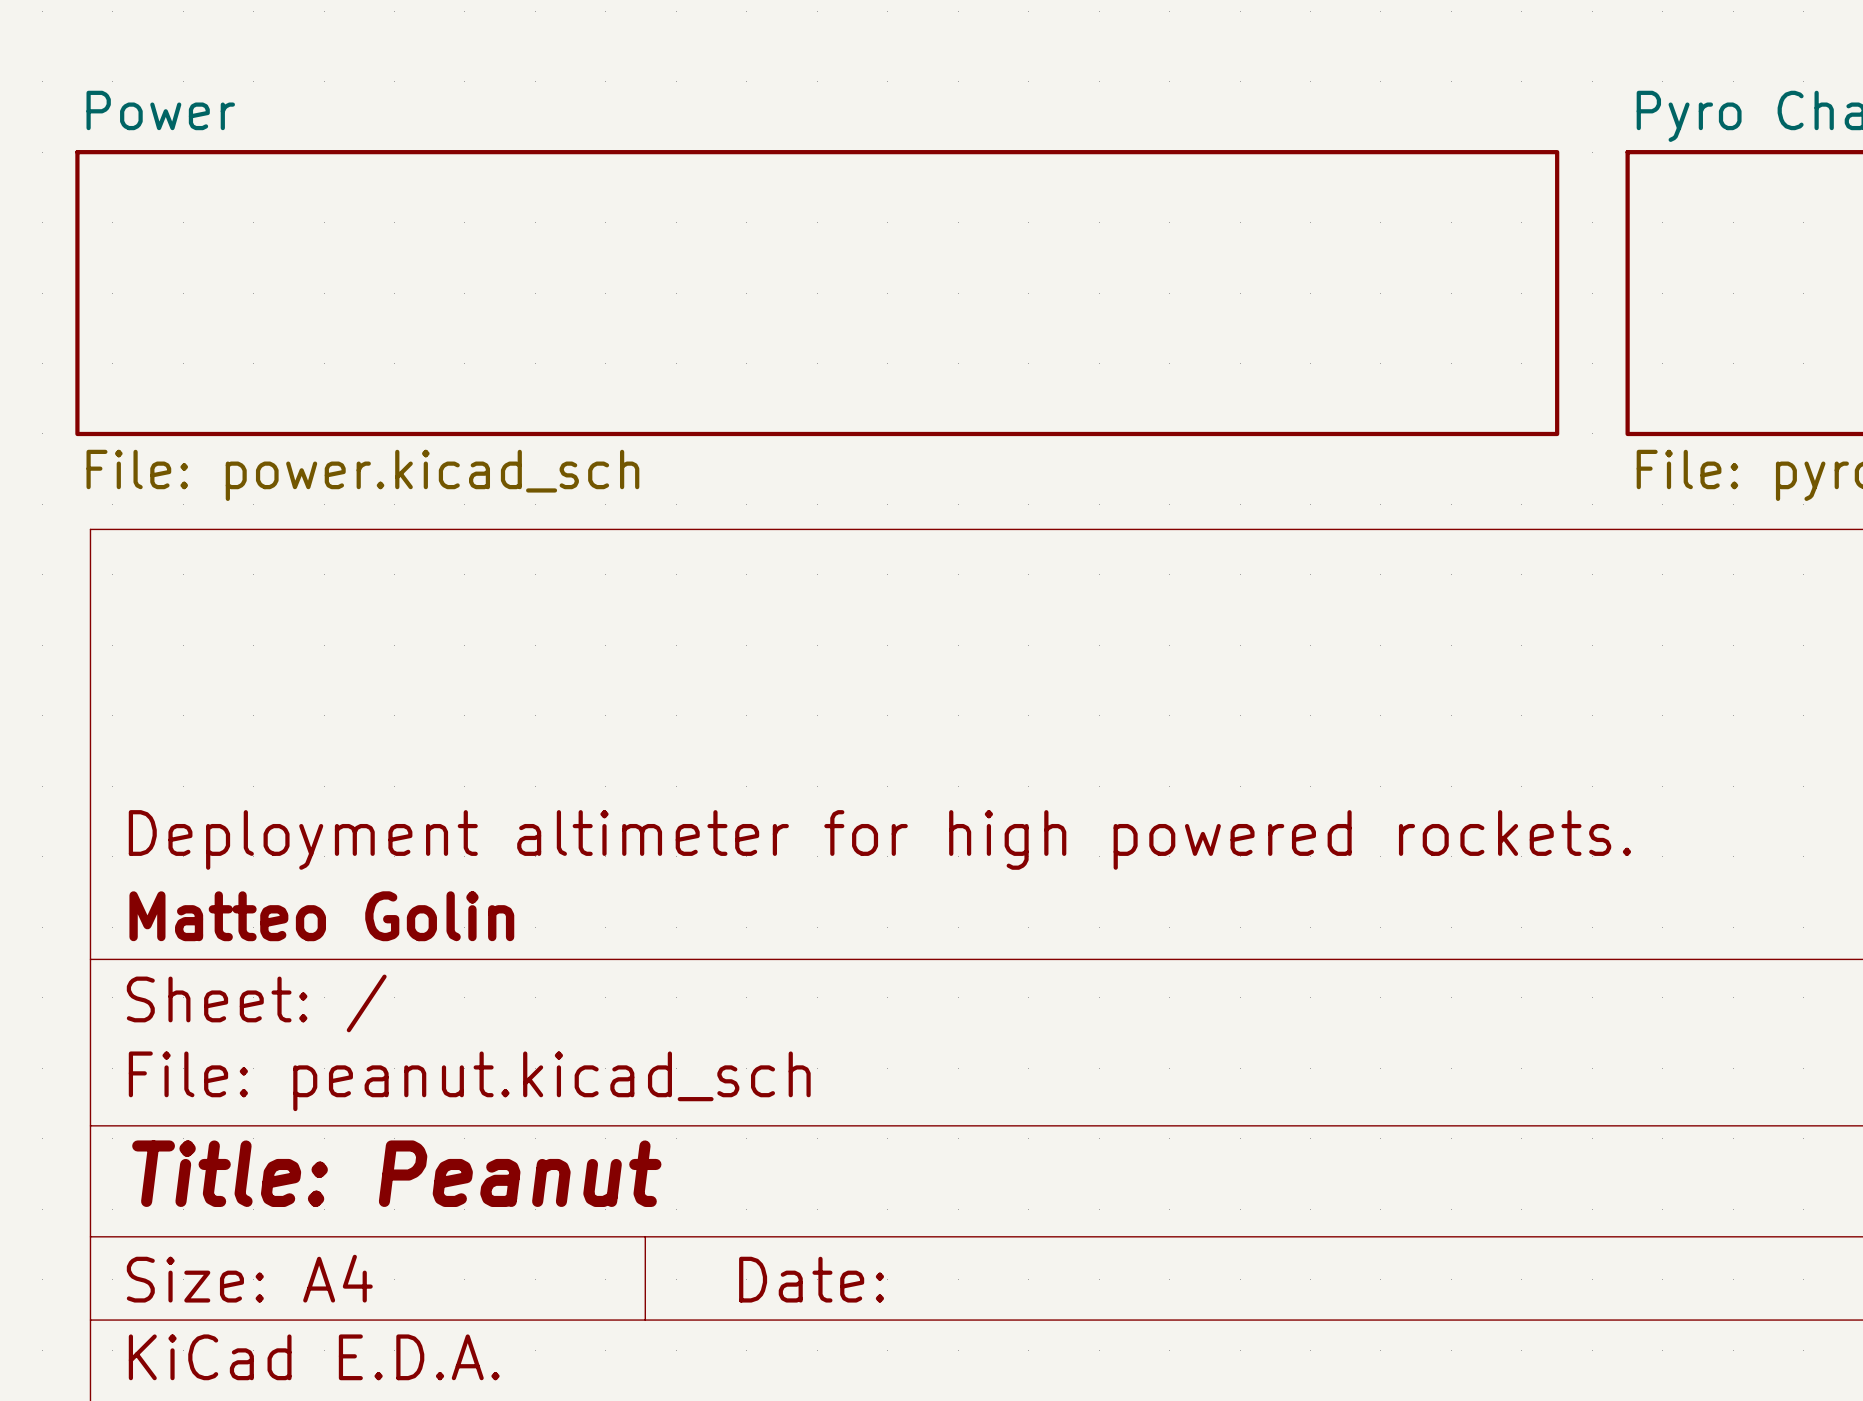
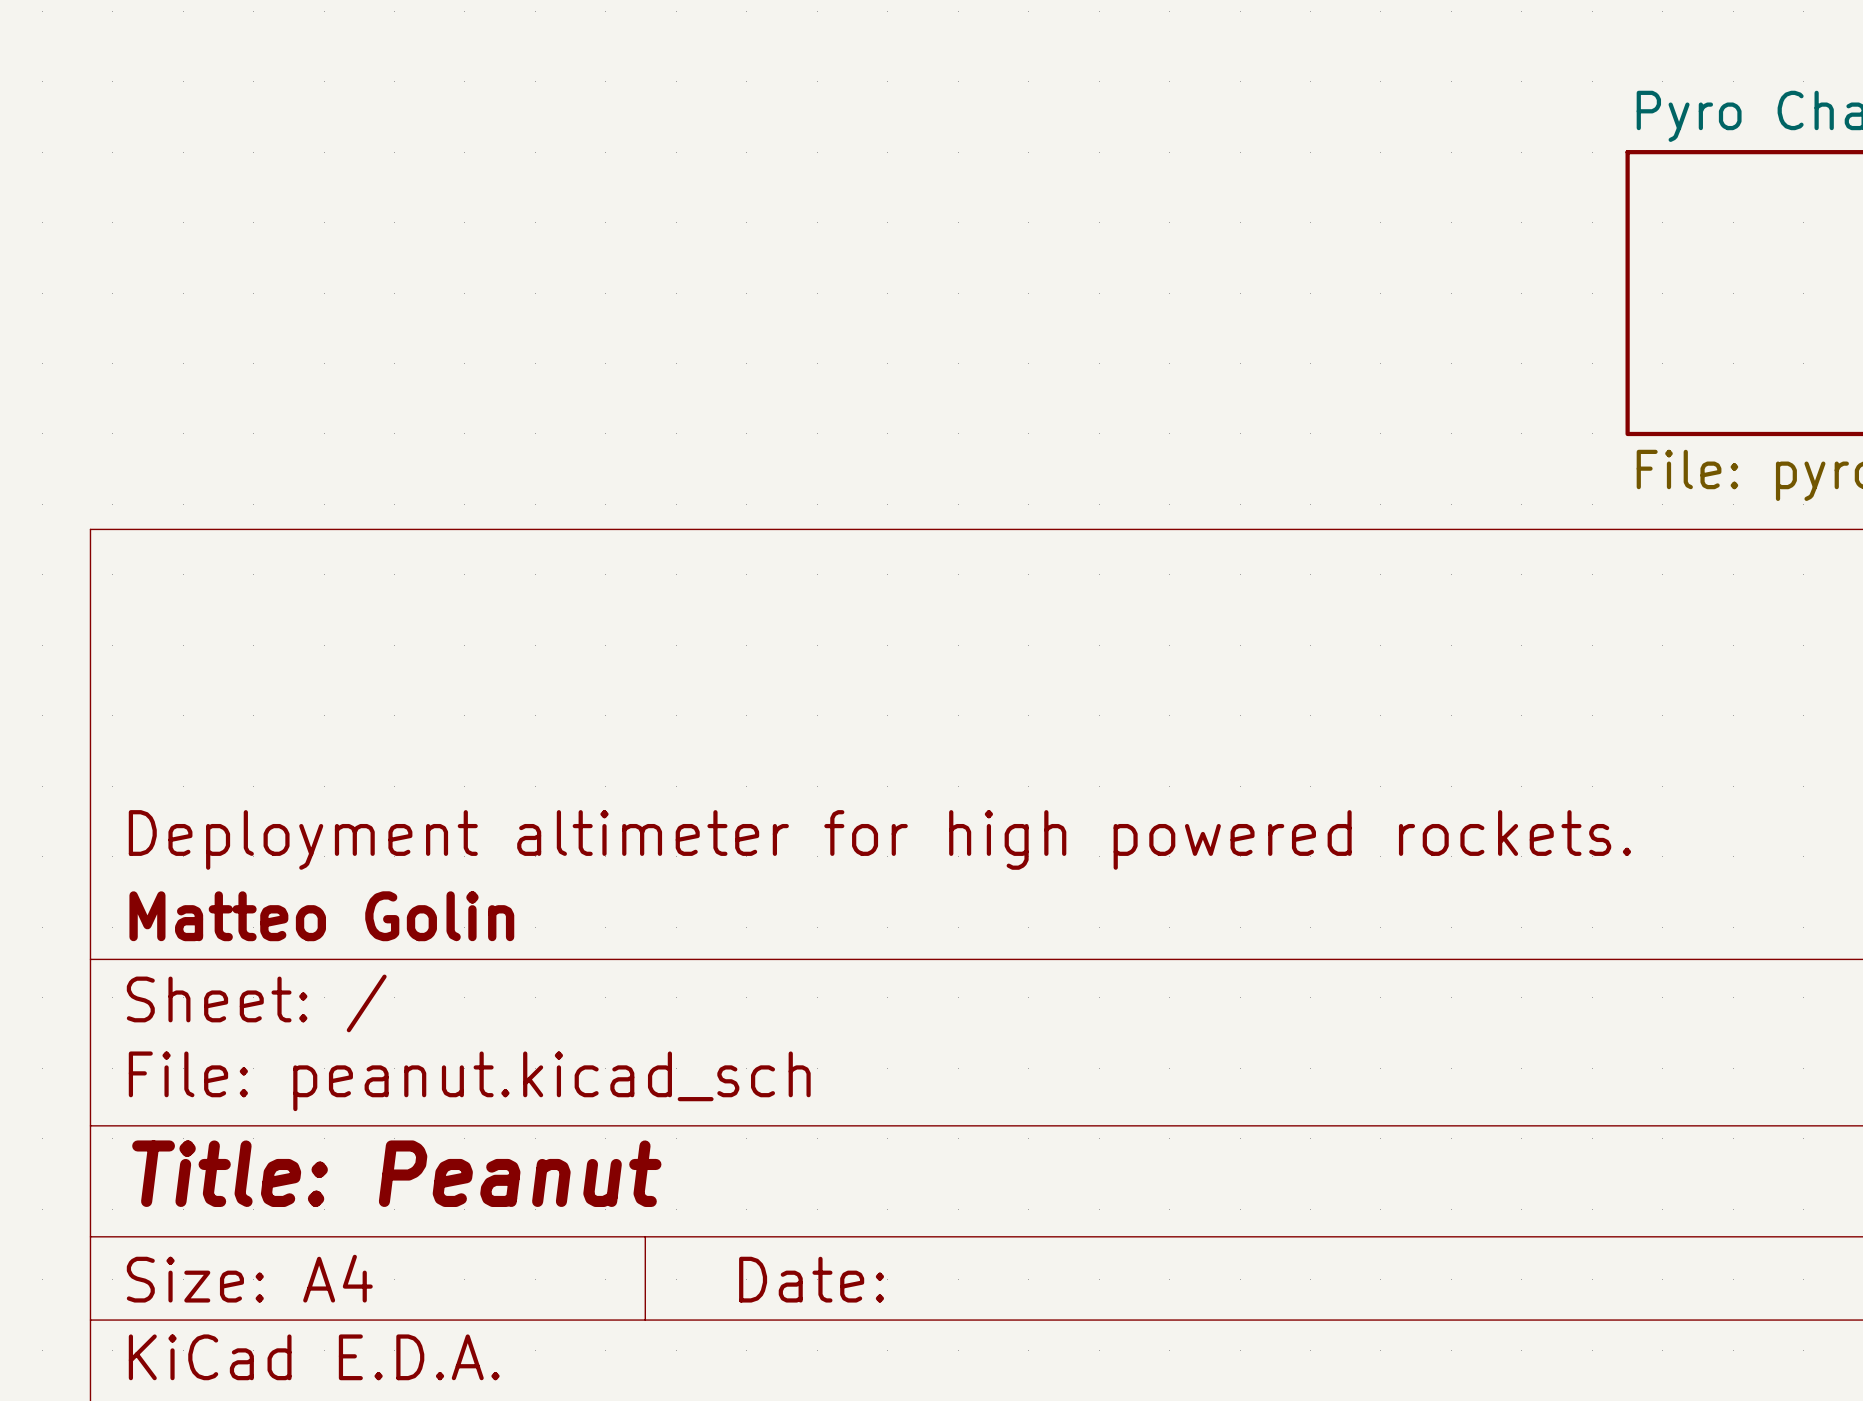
sheet Power: File: power.kicad_sch (817, 293) -> none

